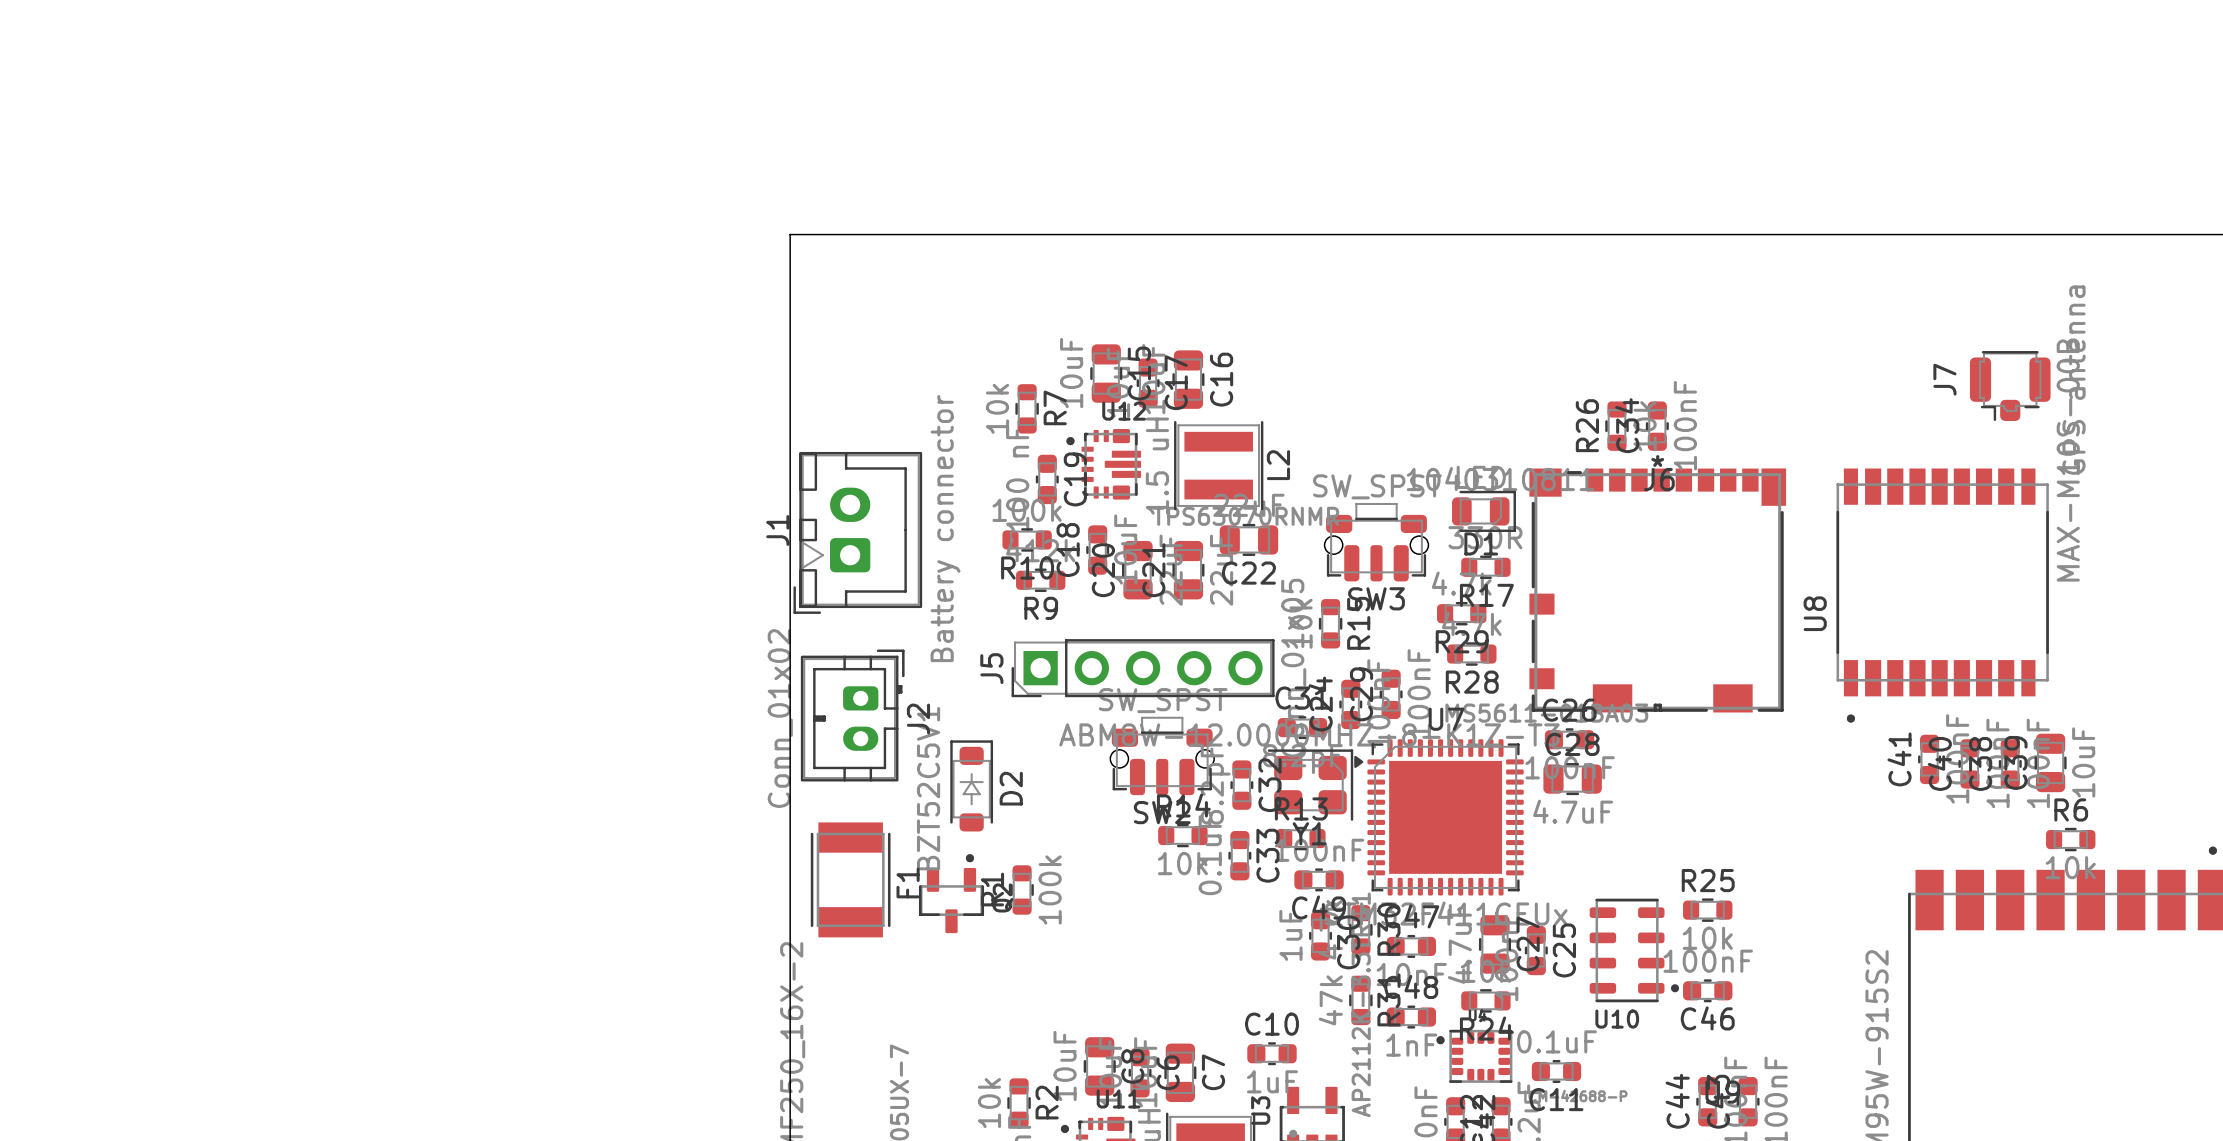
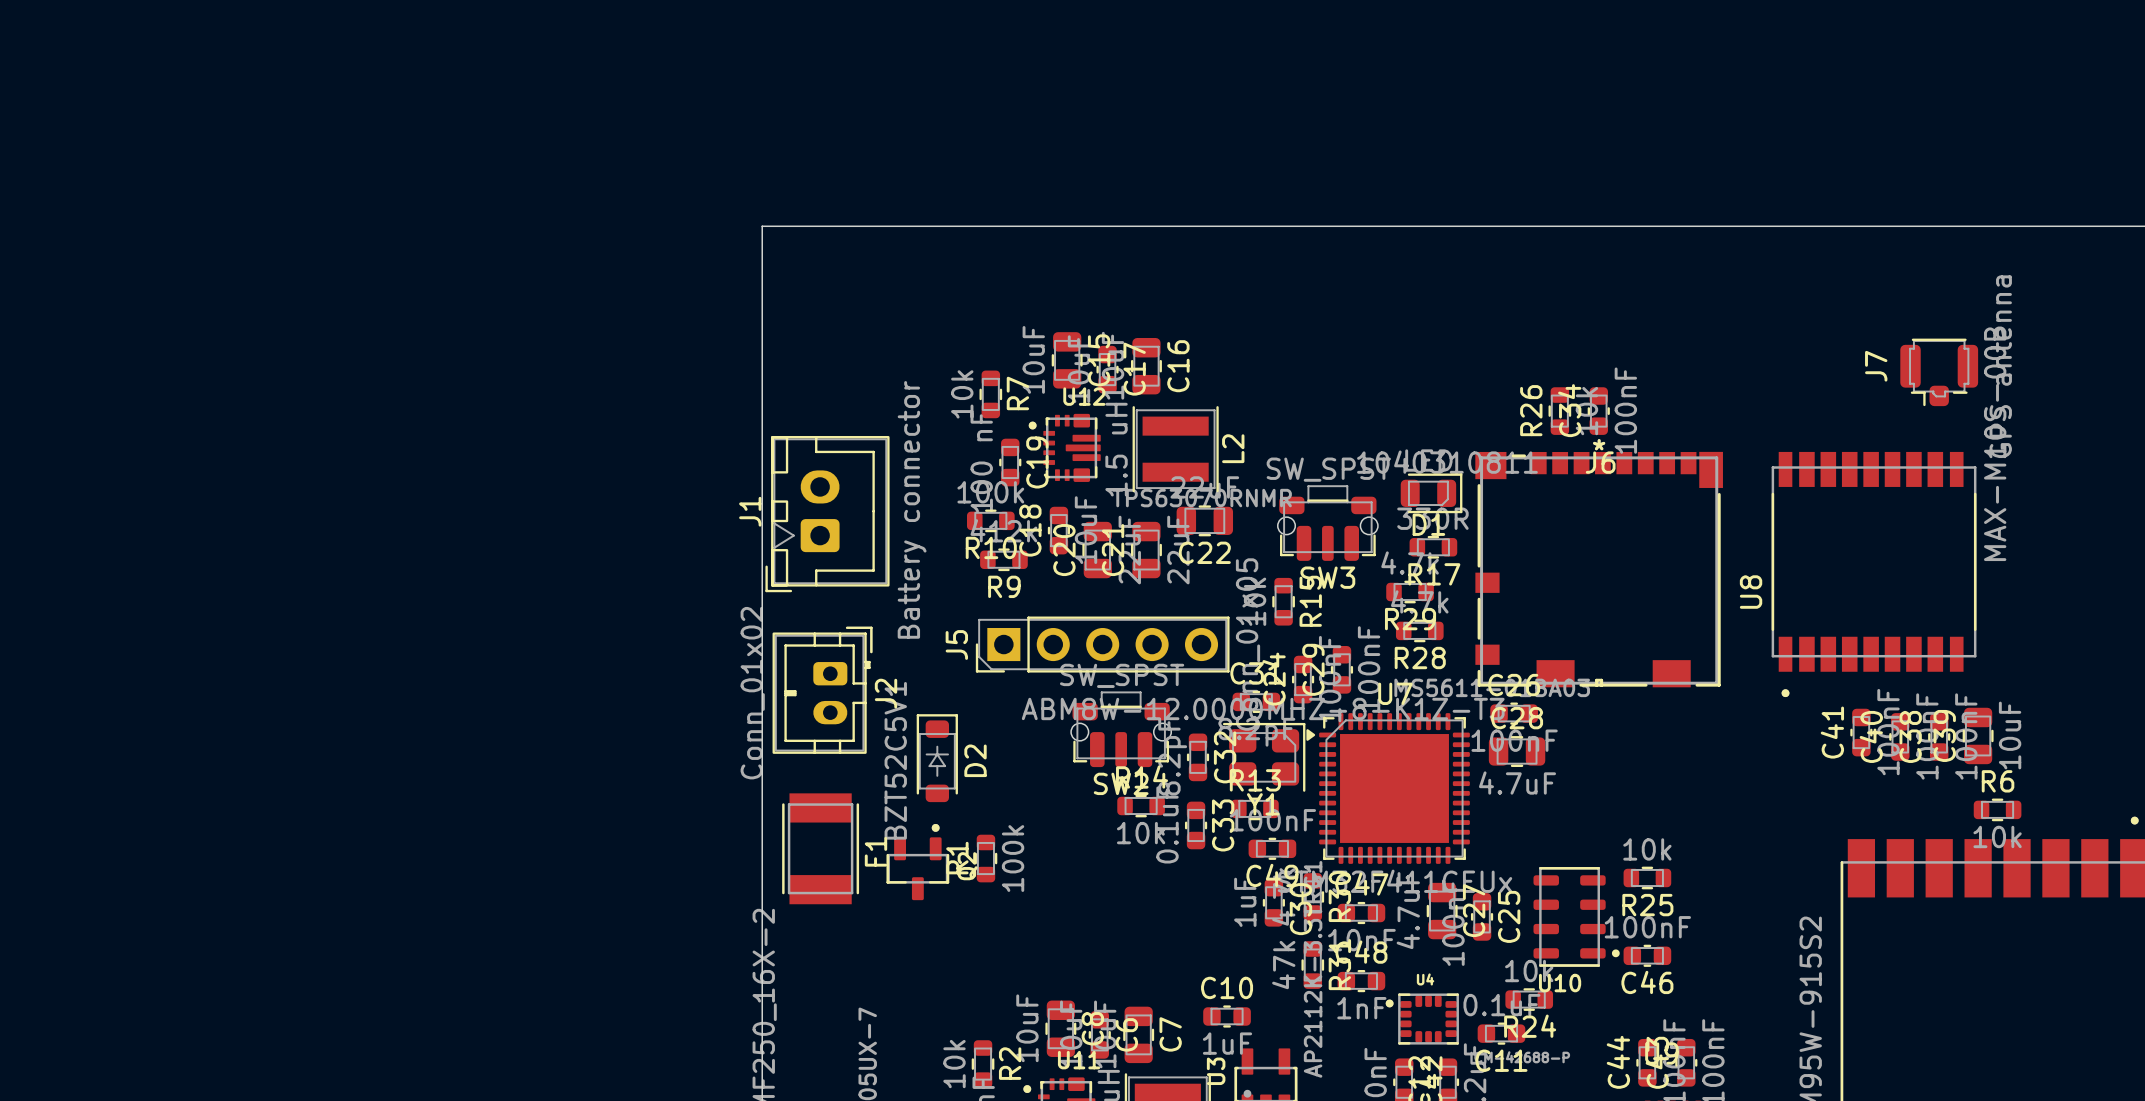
R25 name position: R25 (1708, 880) -> R25 (1647, 905)
R25 value position: 10k (1707, 938) -> 10k (1647, 849)
R24 position: (1485, 1000) -> (1529, 999)

